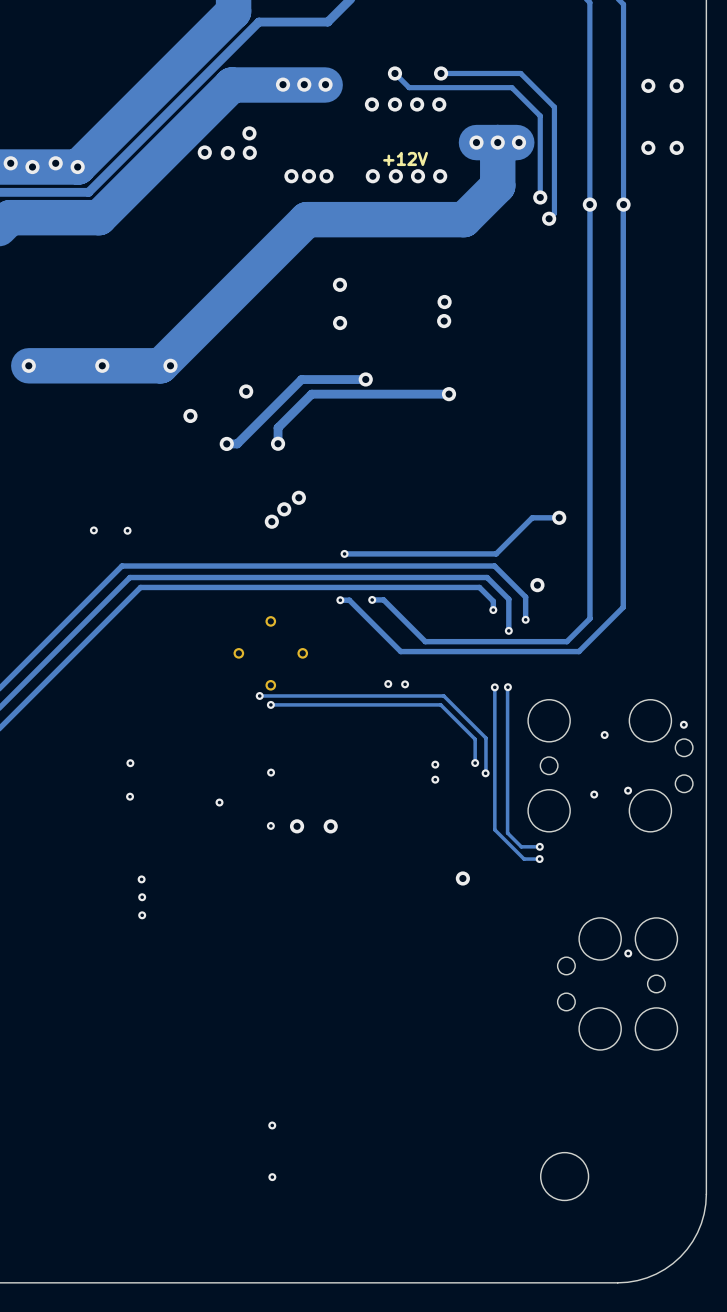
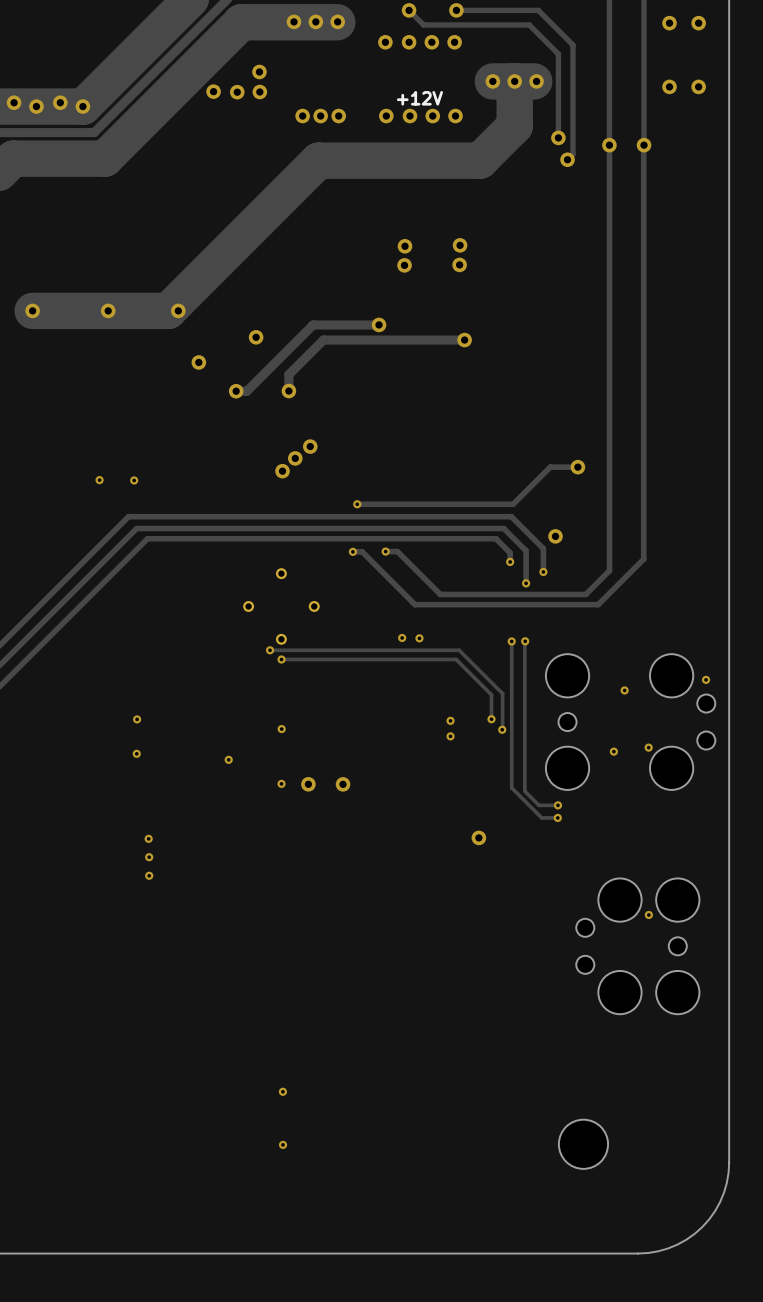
via: (339, 284) -> none
via: none -> (405, 246)
via: none -> (404, 265)
via: (340, 323) -> none

